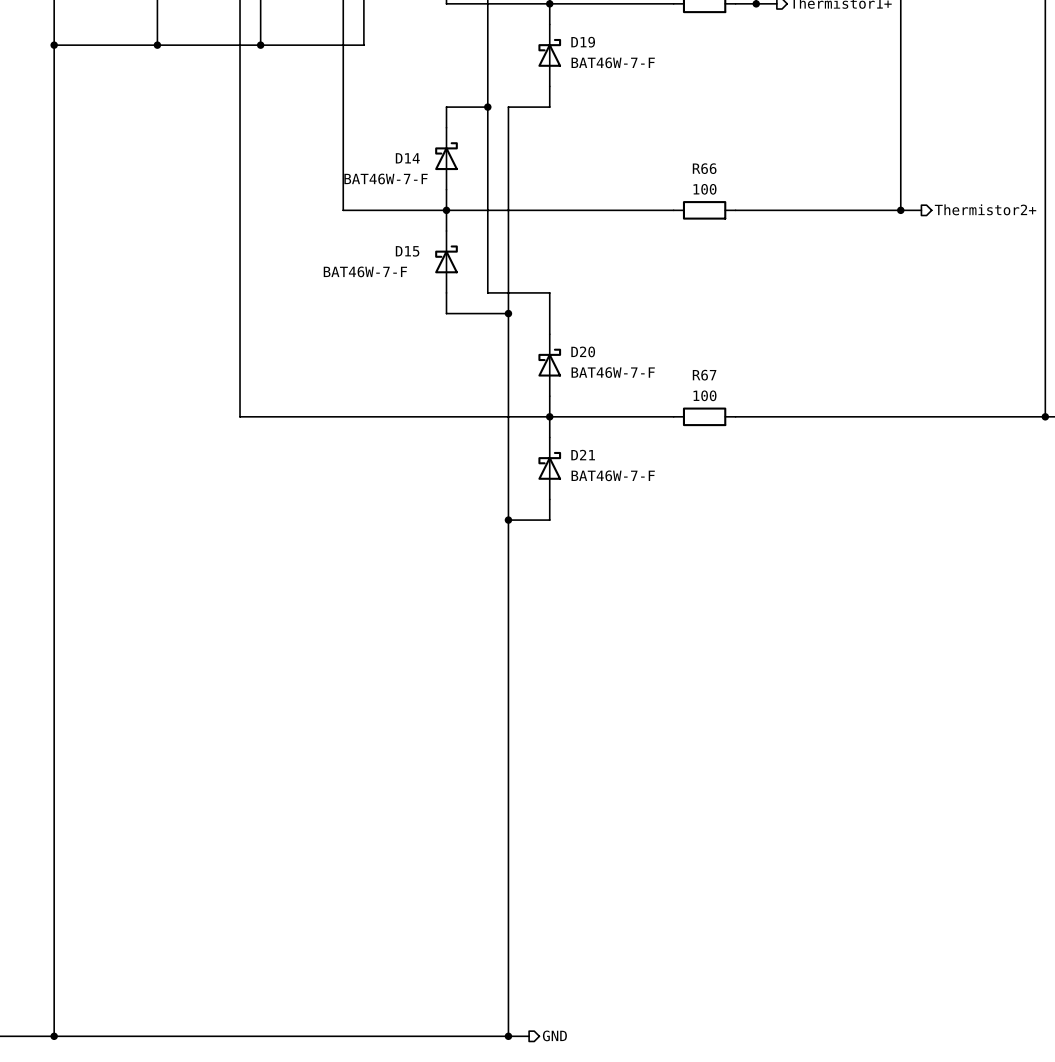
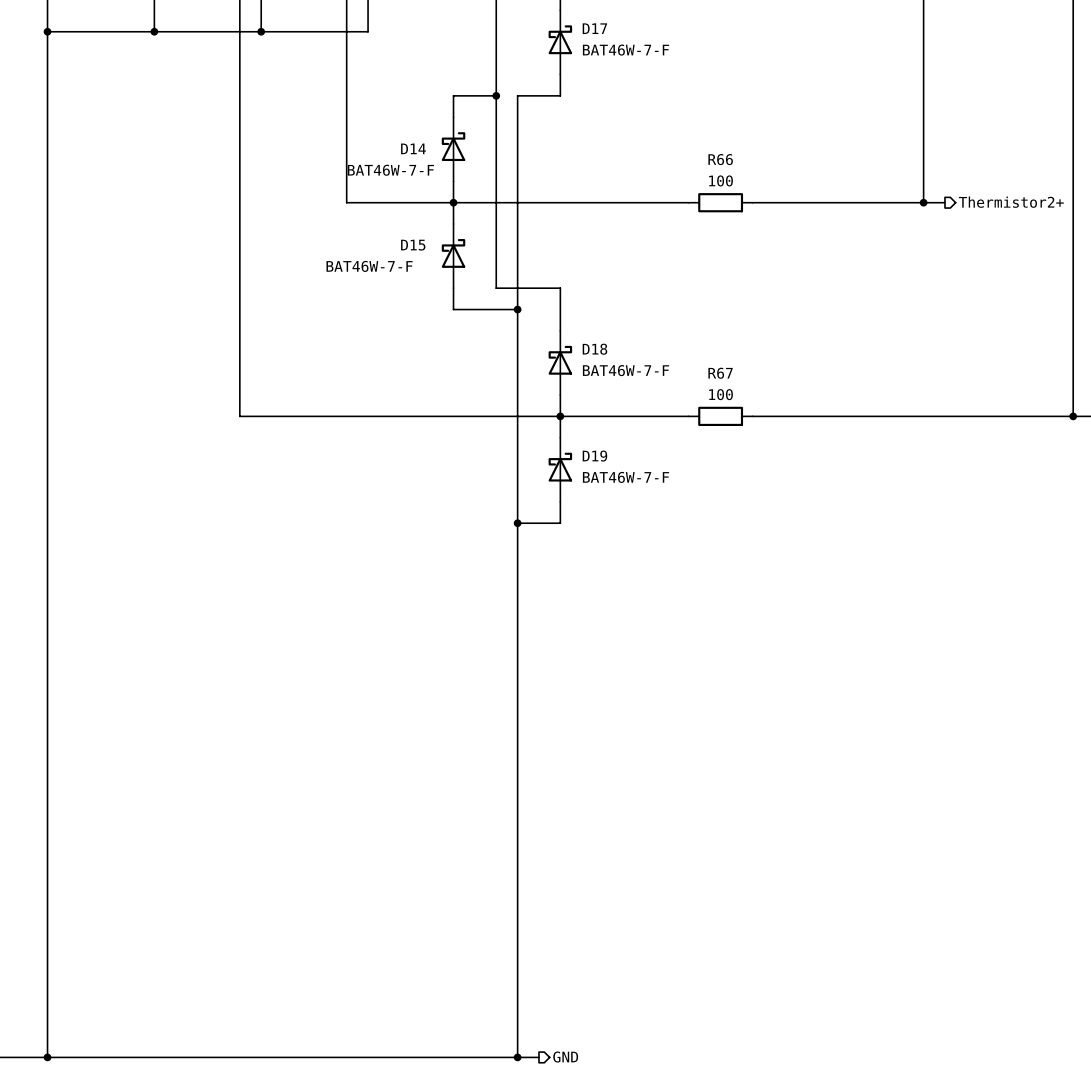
D19 name: D19 (583, 42) -> D17 (594, 28)
D20 name: D20 (583, 351) -> D18 (594, 349)
D21 name: D21 (583, 455) -> D19 (594, 456)

